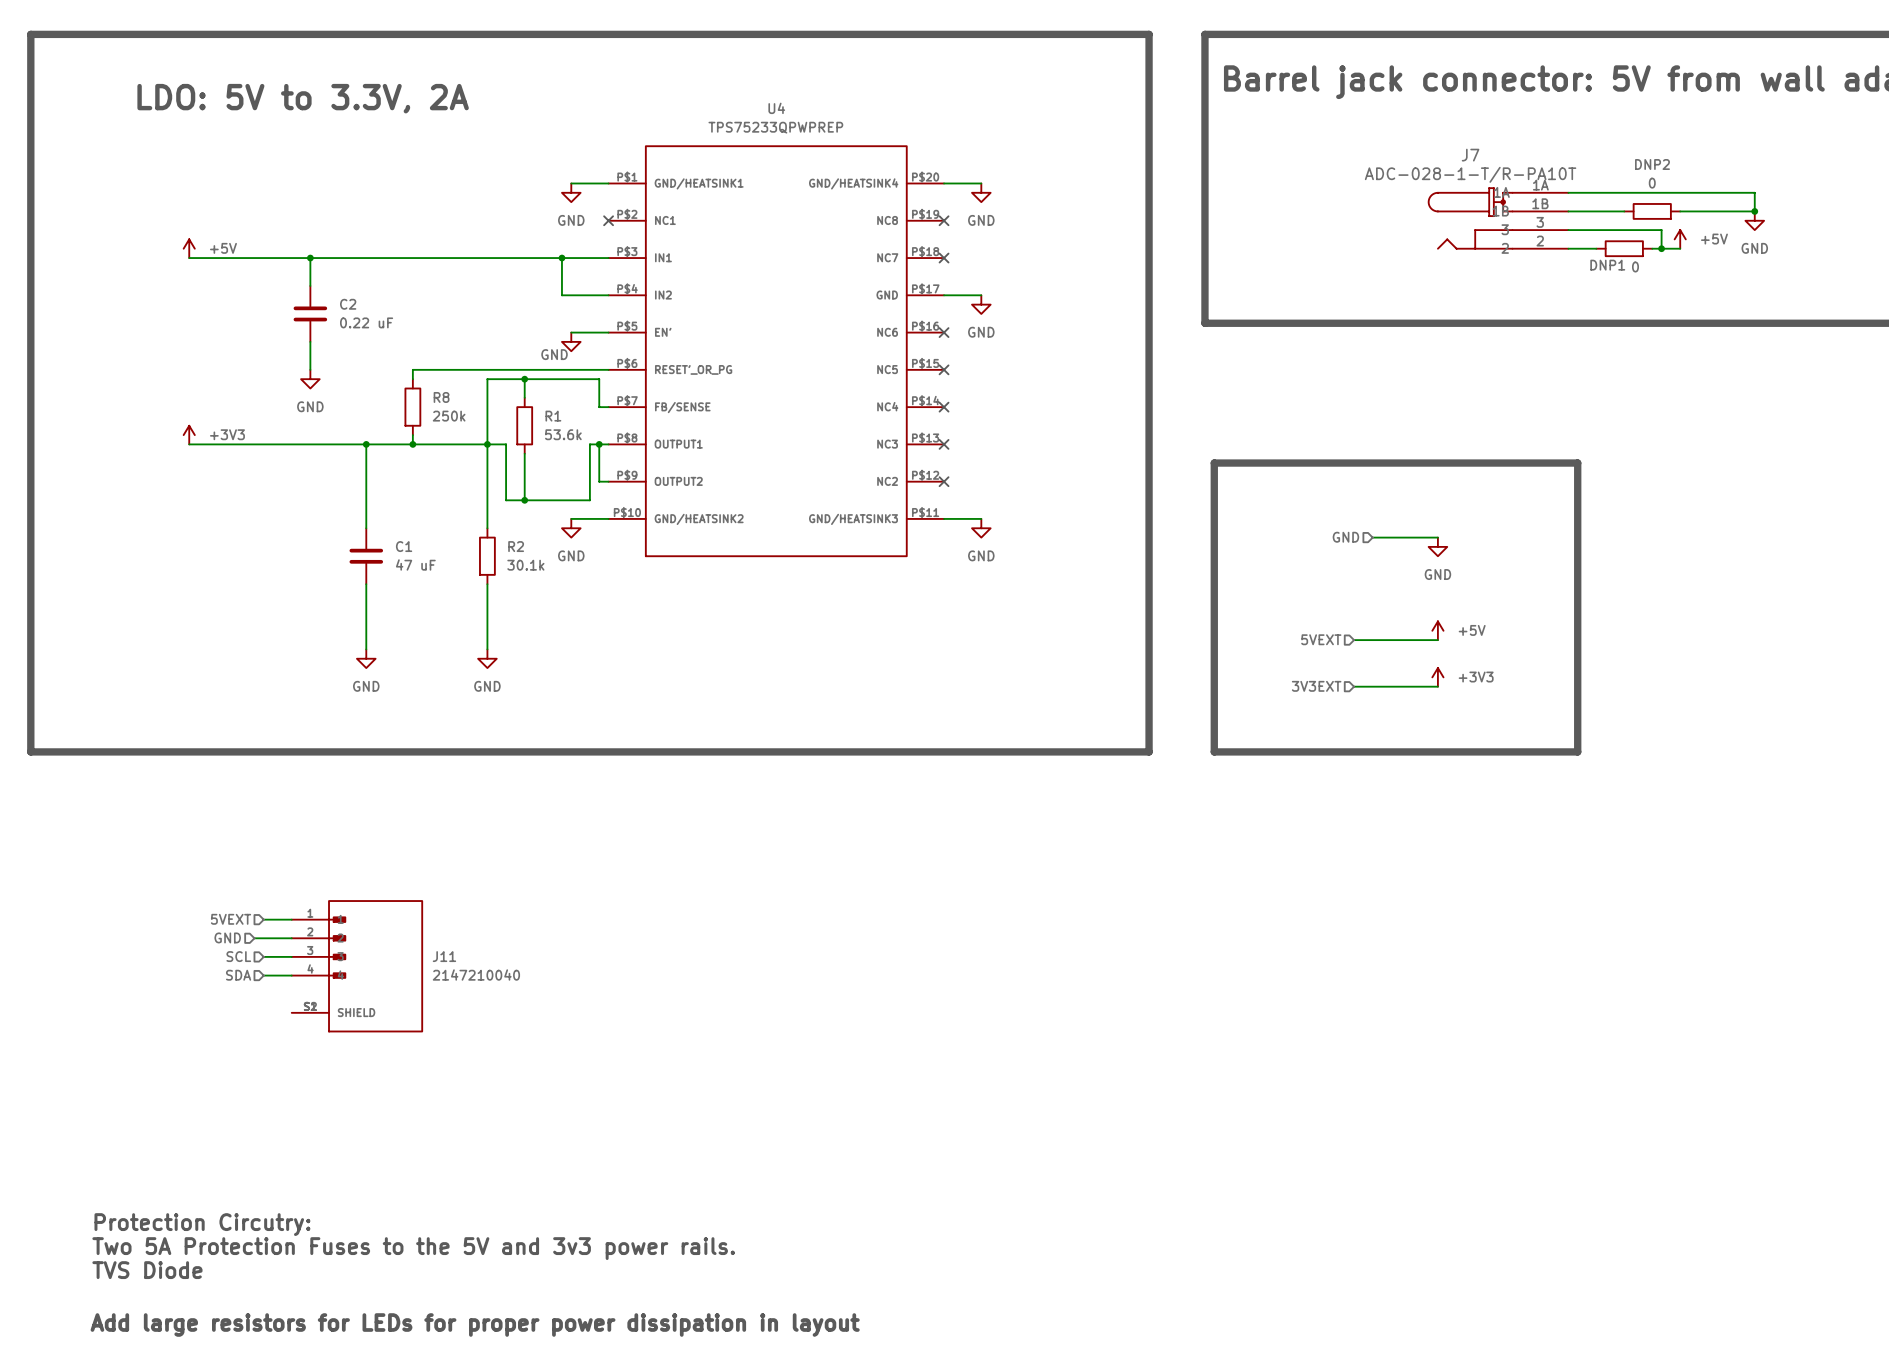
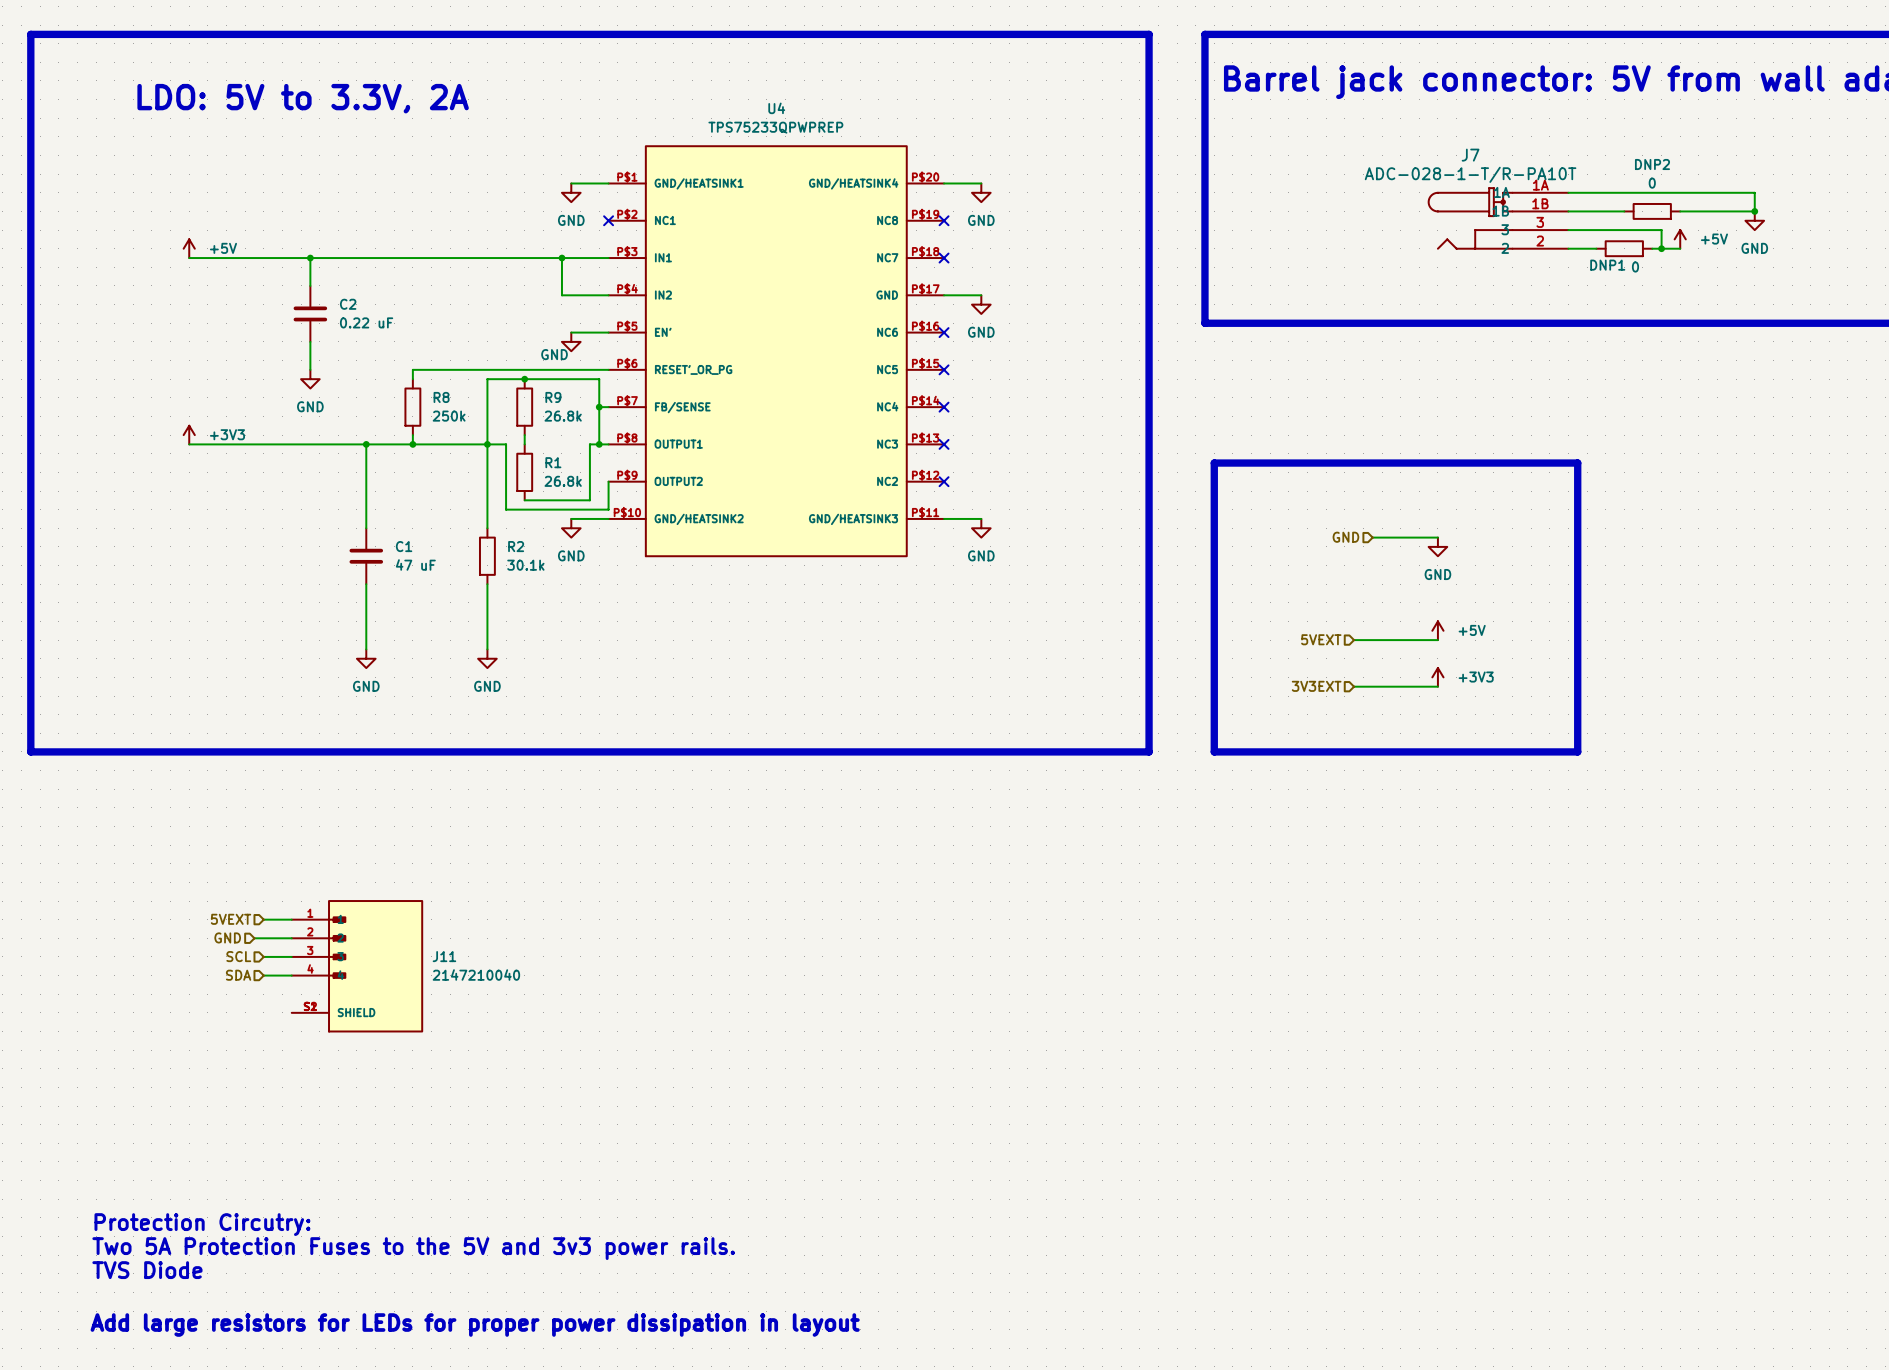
R9: none -> 26.8k (524, 407)
junction: none -> (599, 407)
R1 position: (524, 425) -> (524, 472)
R1 value: 53.6k (563, 434) -> 26.8k (563, 481)
wire: none -> (524, 435) (524, 444)
wire: (599, 444) (599, 481) (608, 481) -> (599, 444) (599, 407)
wire: (524, 453) (524, 500) (506, 500) -> (608, 481) (608, 509) (506, 509) (506, 500)
junction: (524, 500) -> none

